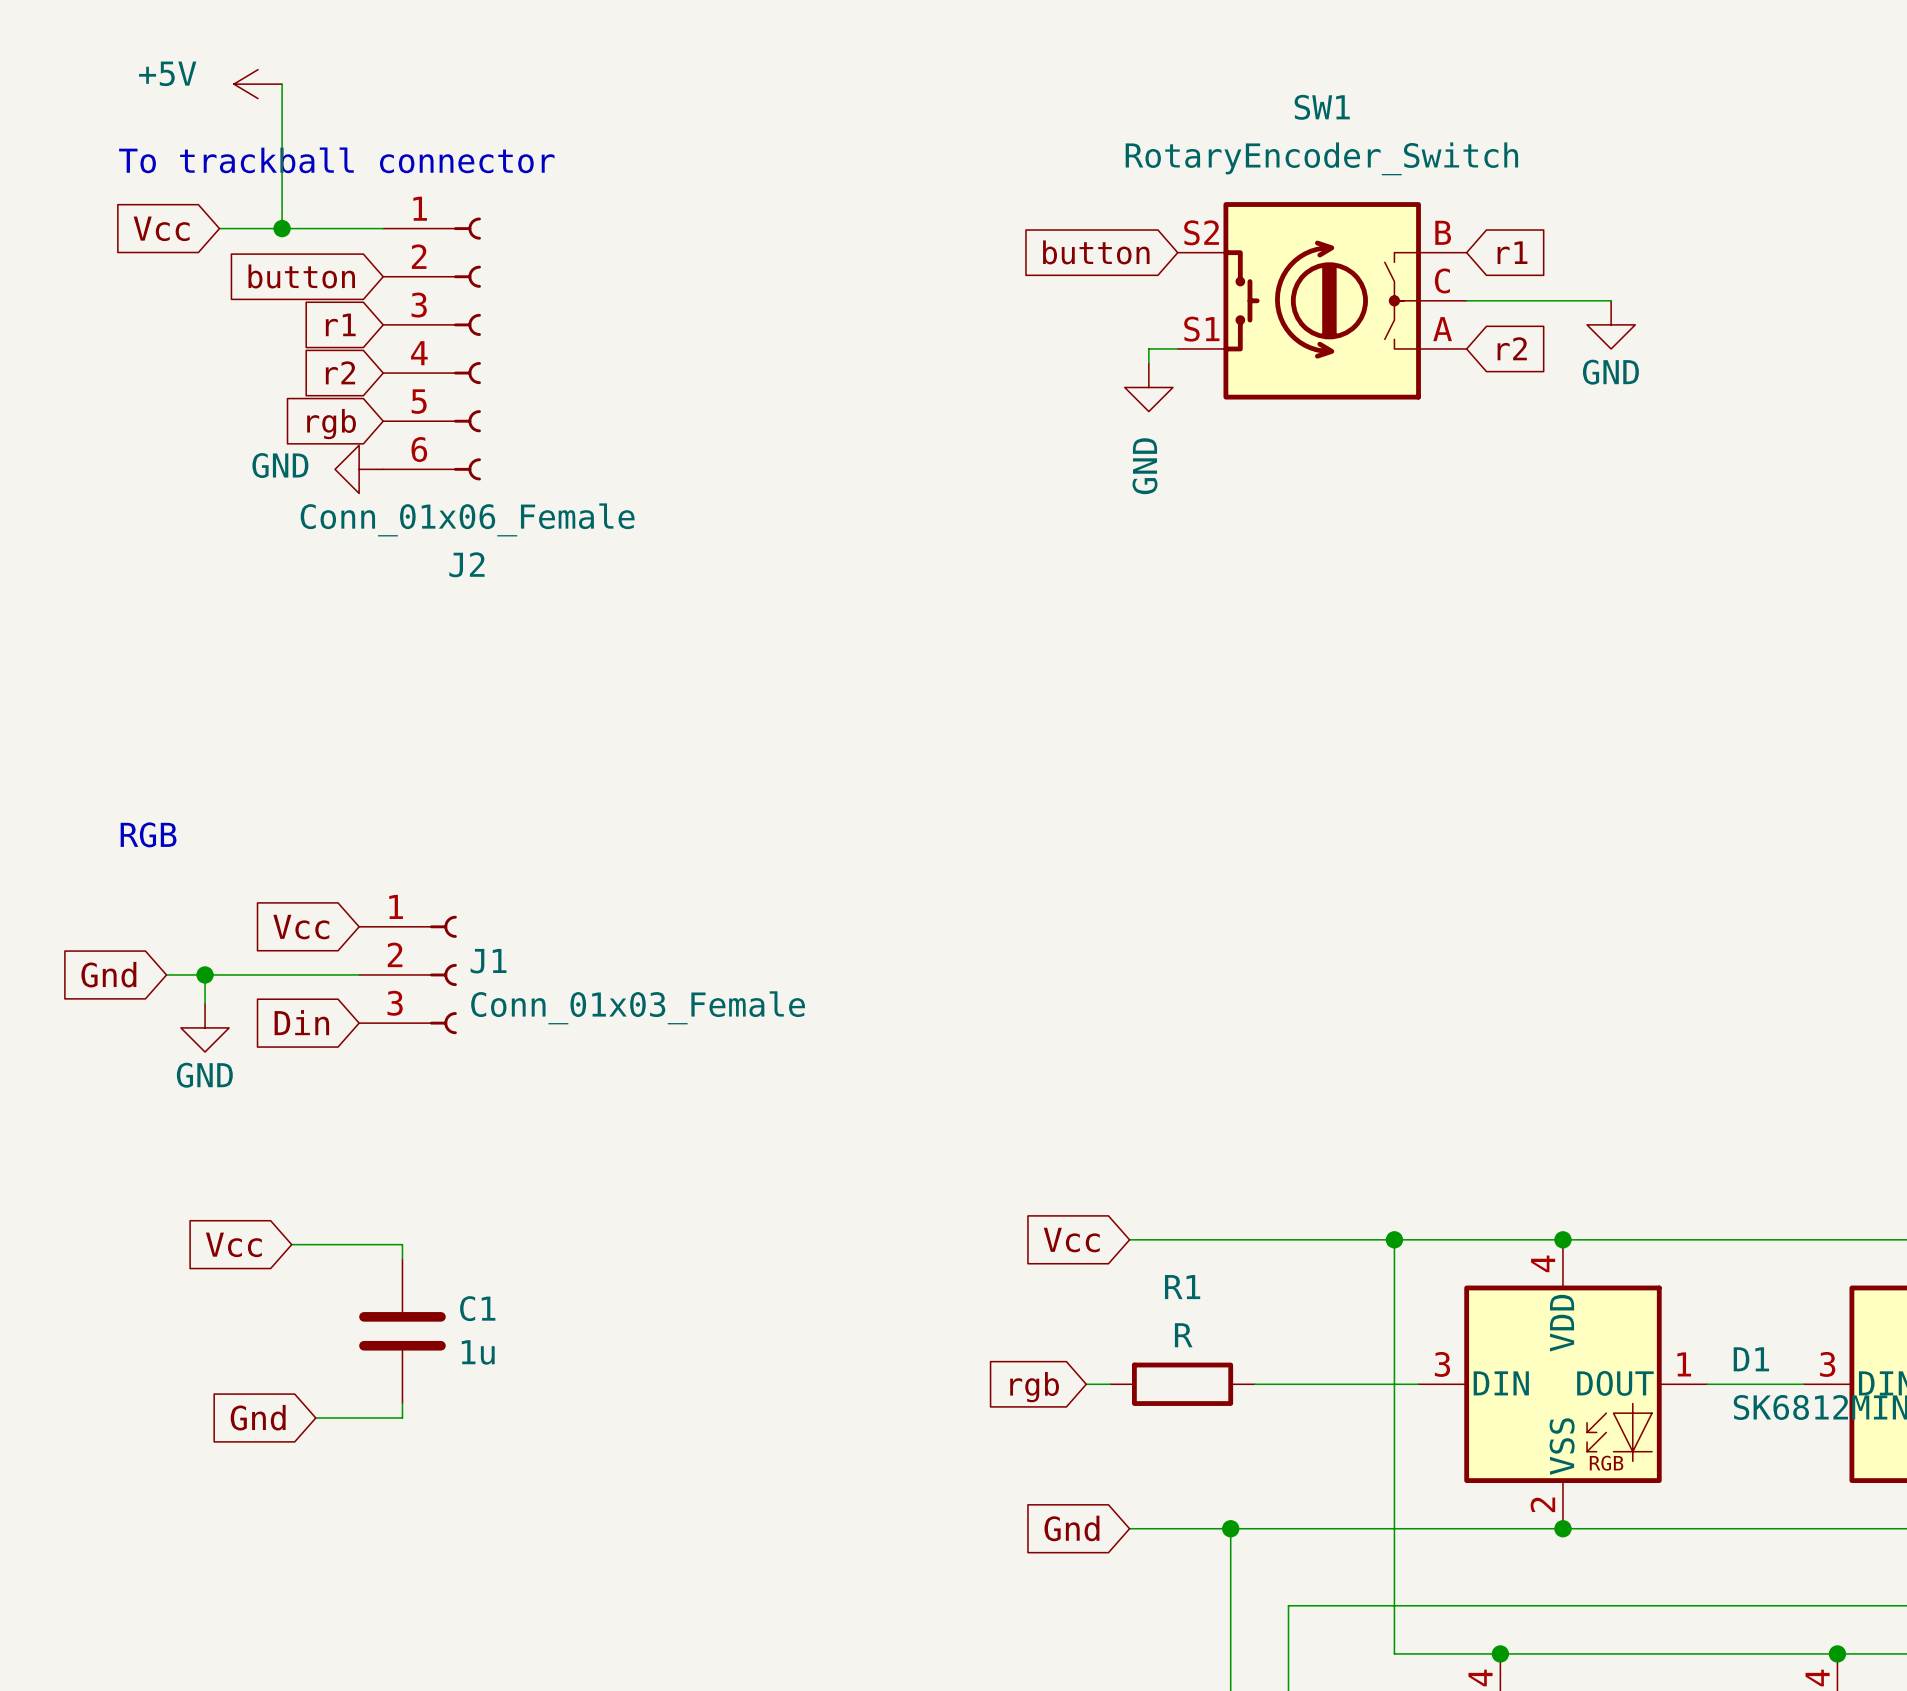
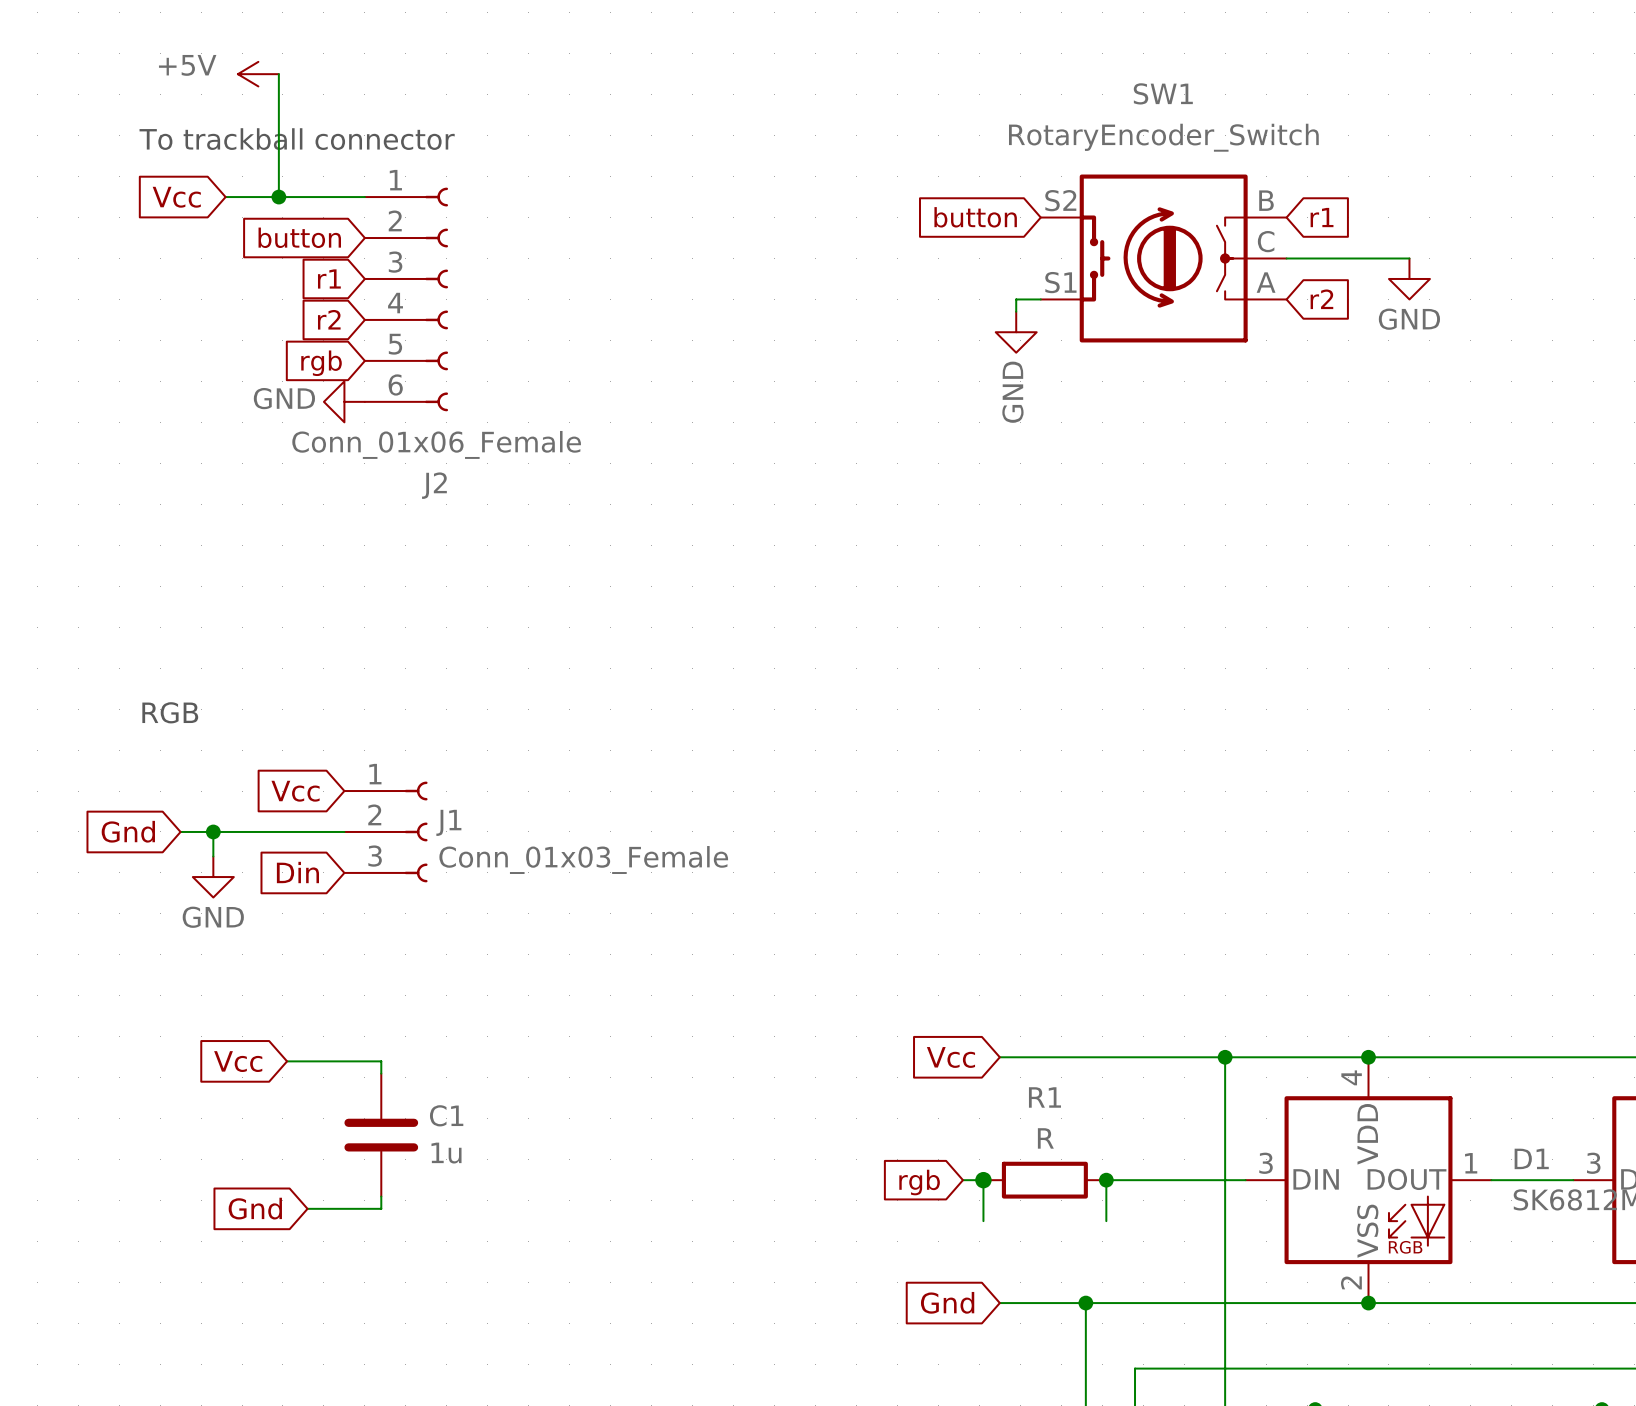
wire: none -> (983, 1180) (983, 1221)
junction: none -> (983, 1180)
wire: none -> (1106, 1180) (1106, 1221)
junction: none -> (1106, 1180)

